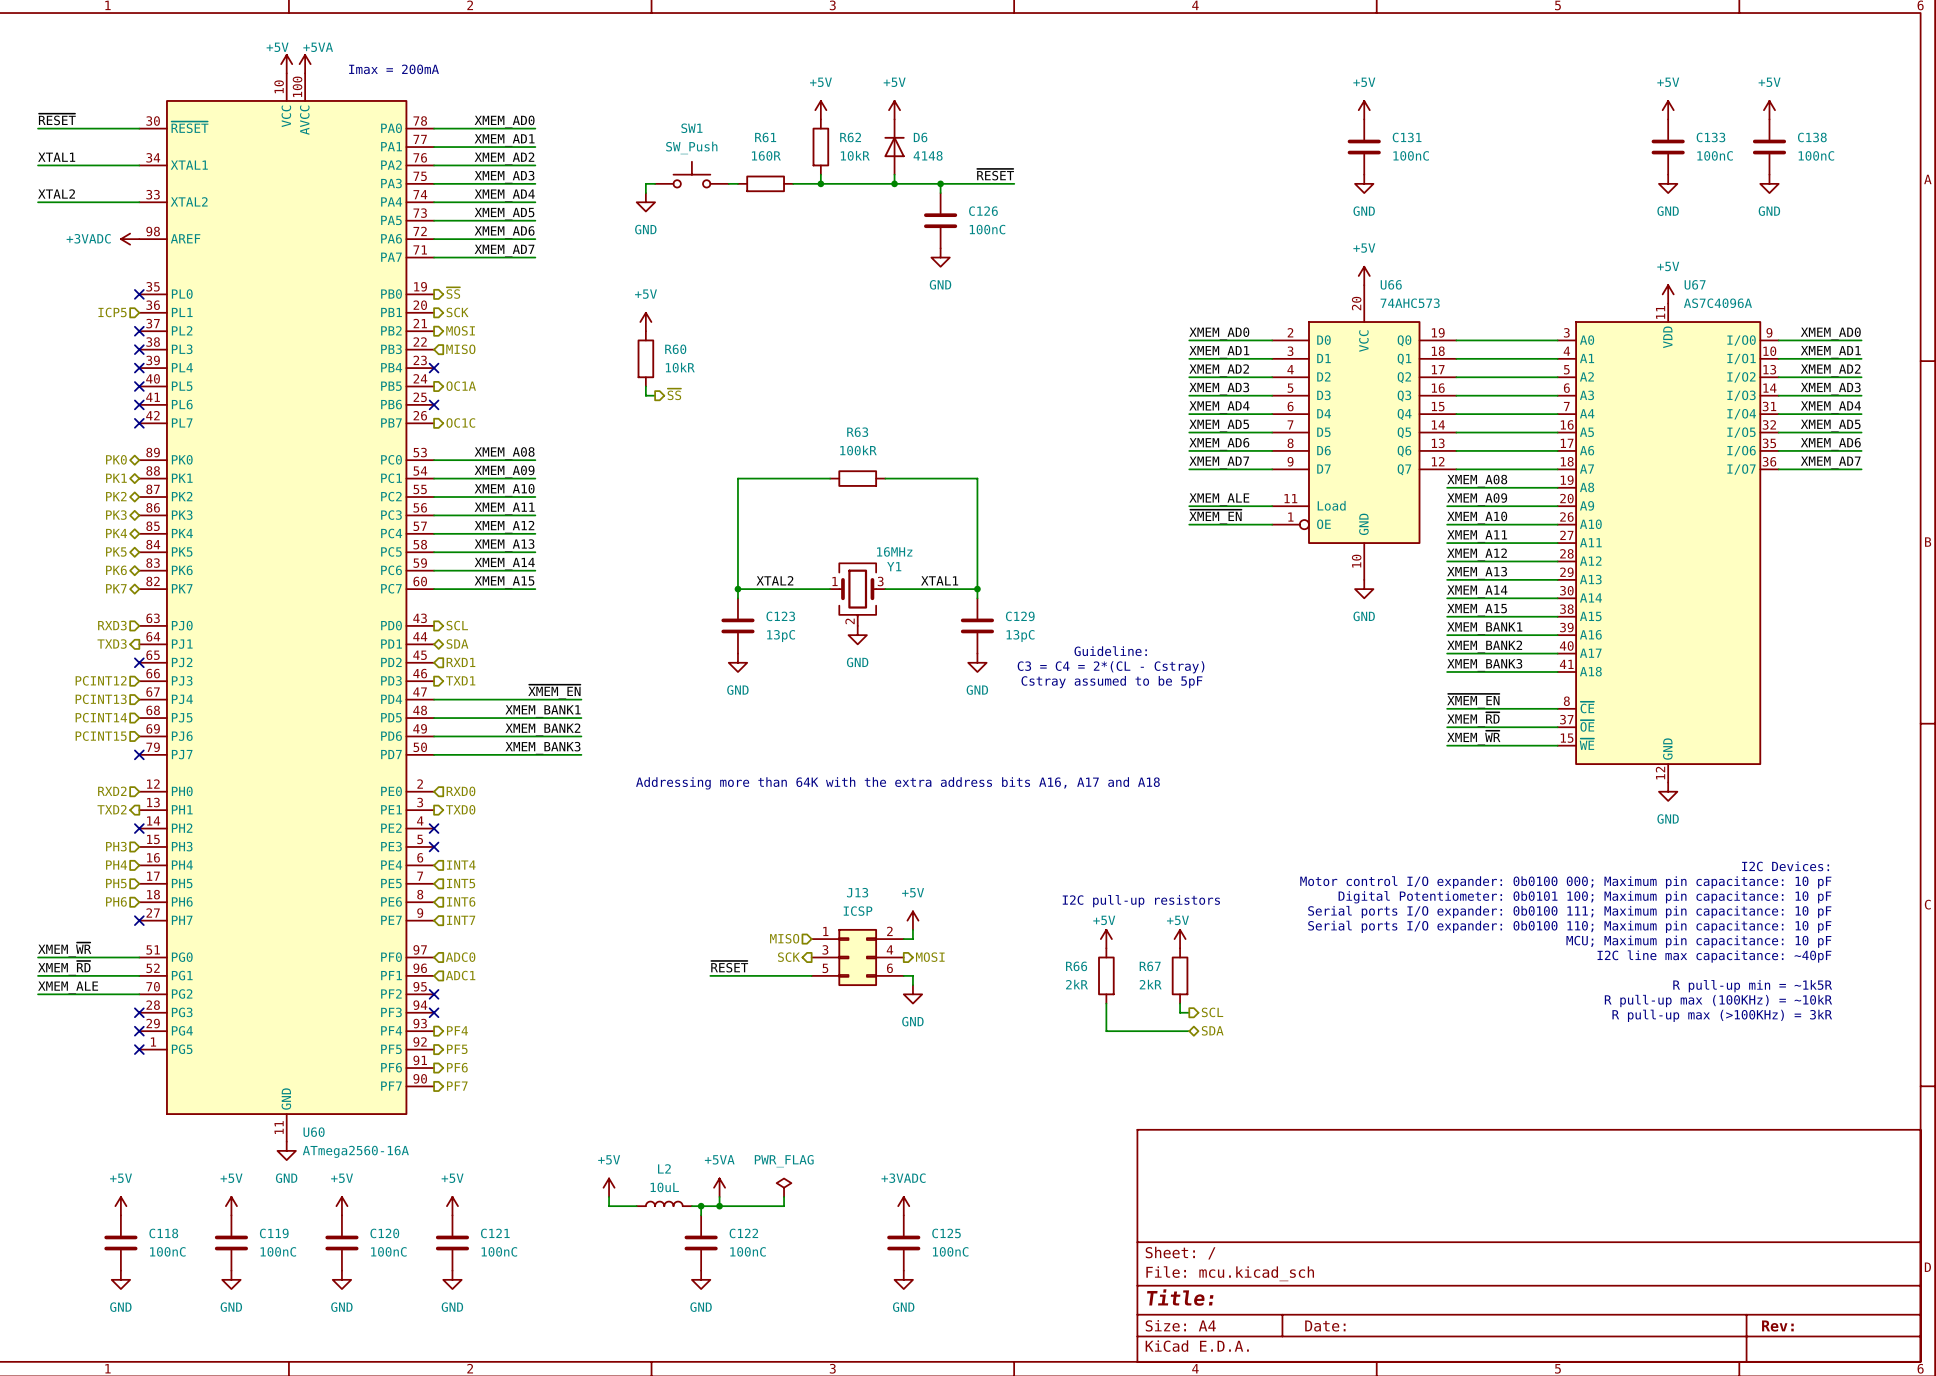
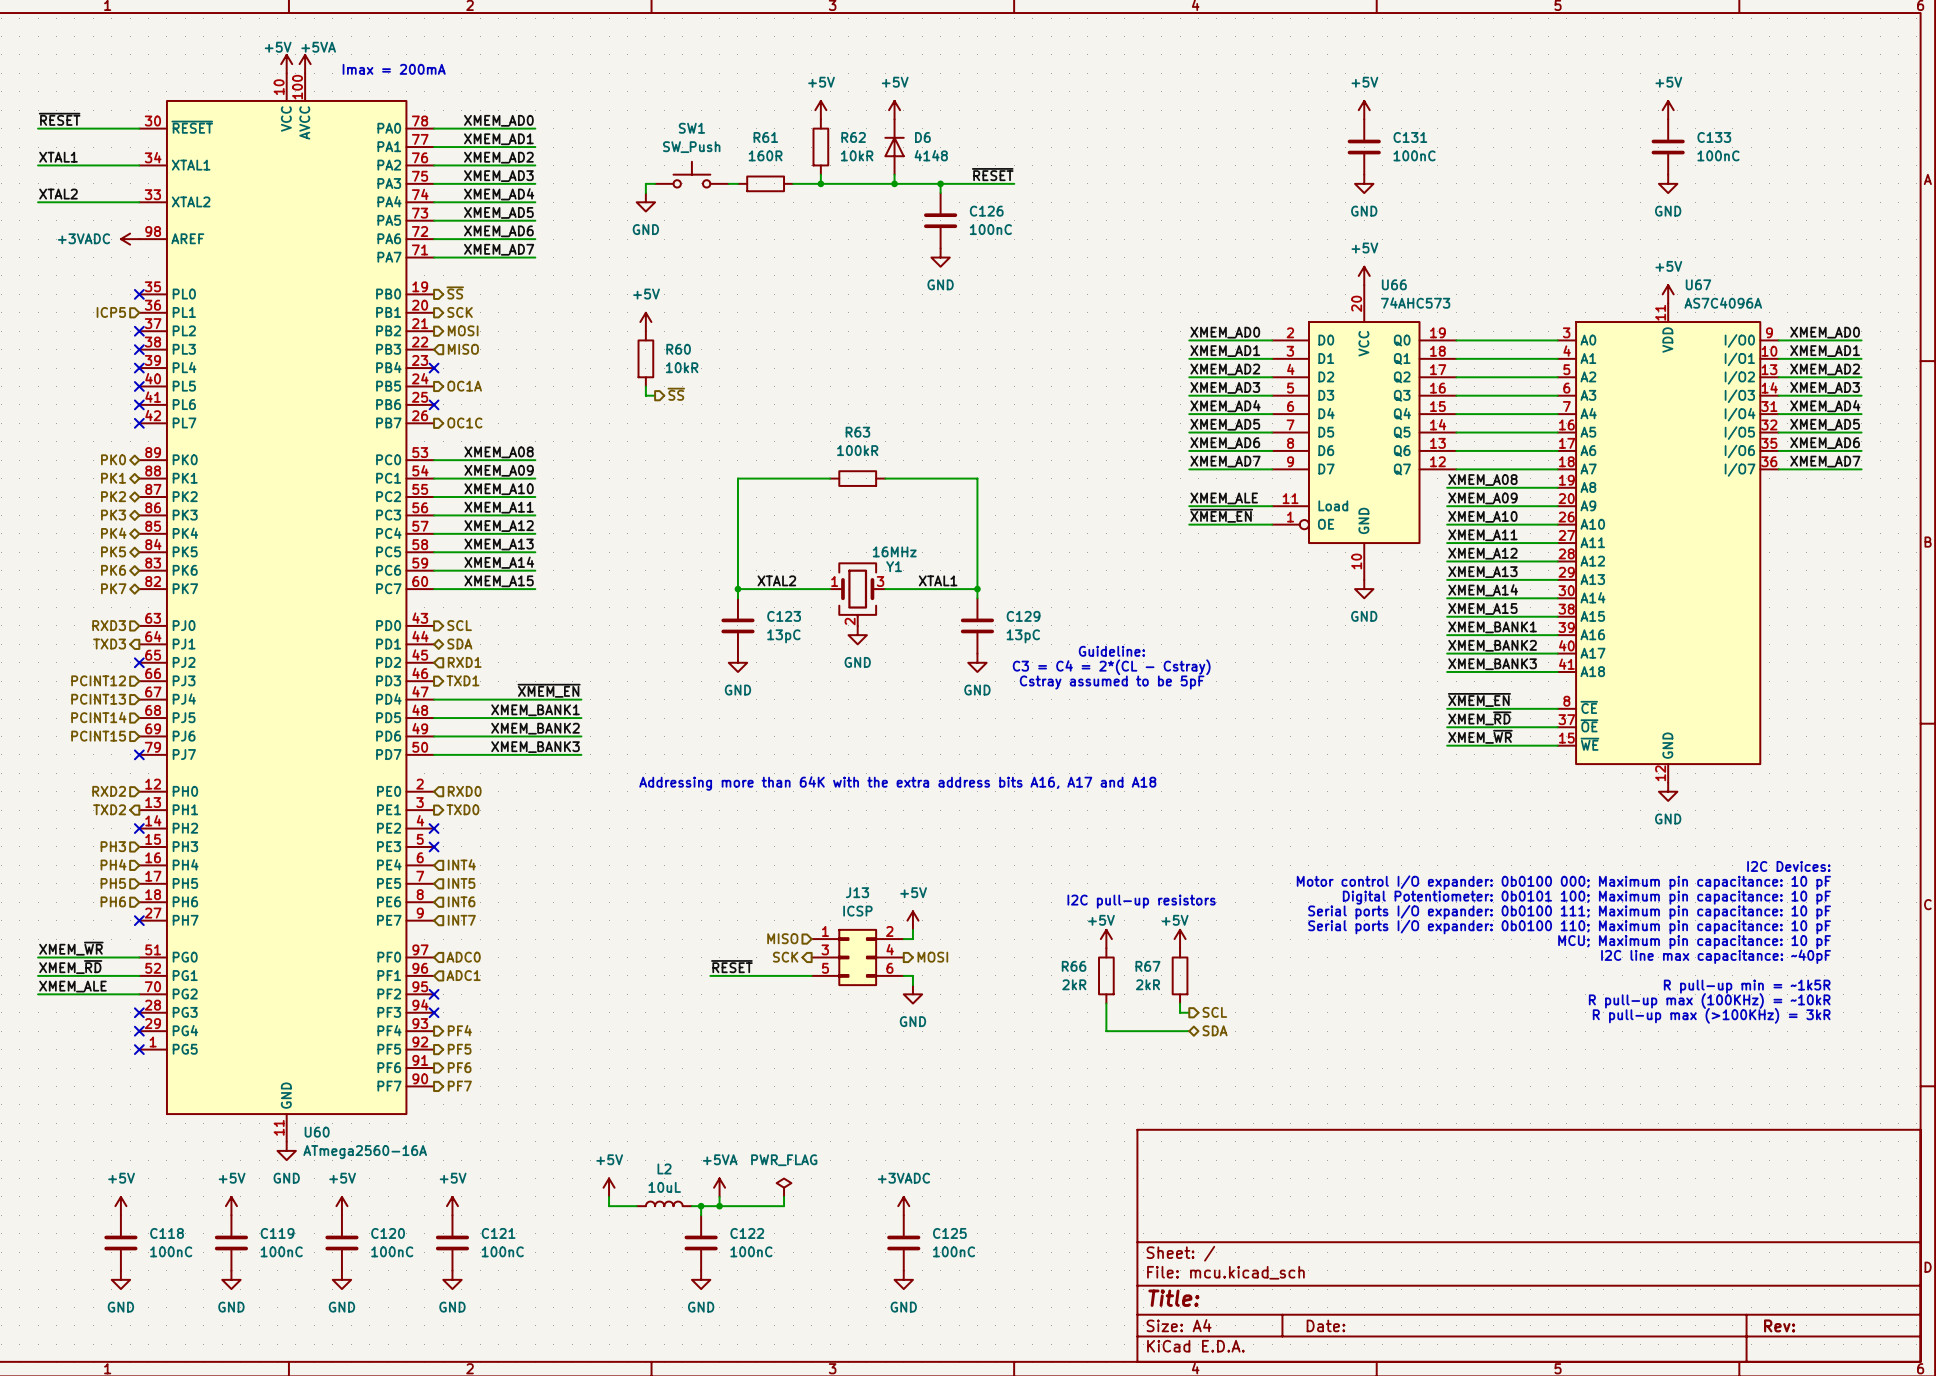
power symbol: +5V (1769, 110) -> none
C138: 100nC (1769, 147) -> none
power symbol: GND (1769, 183) -> none

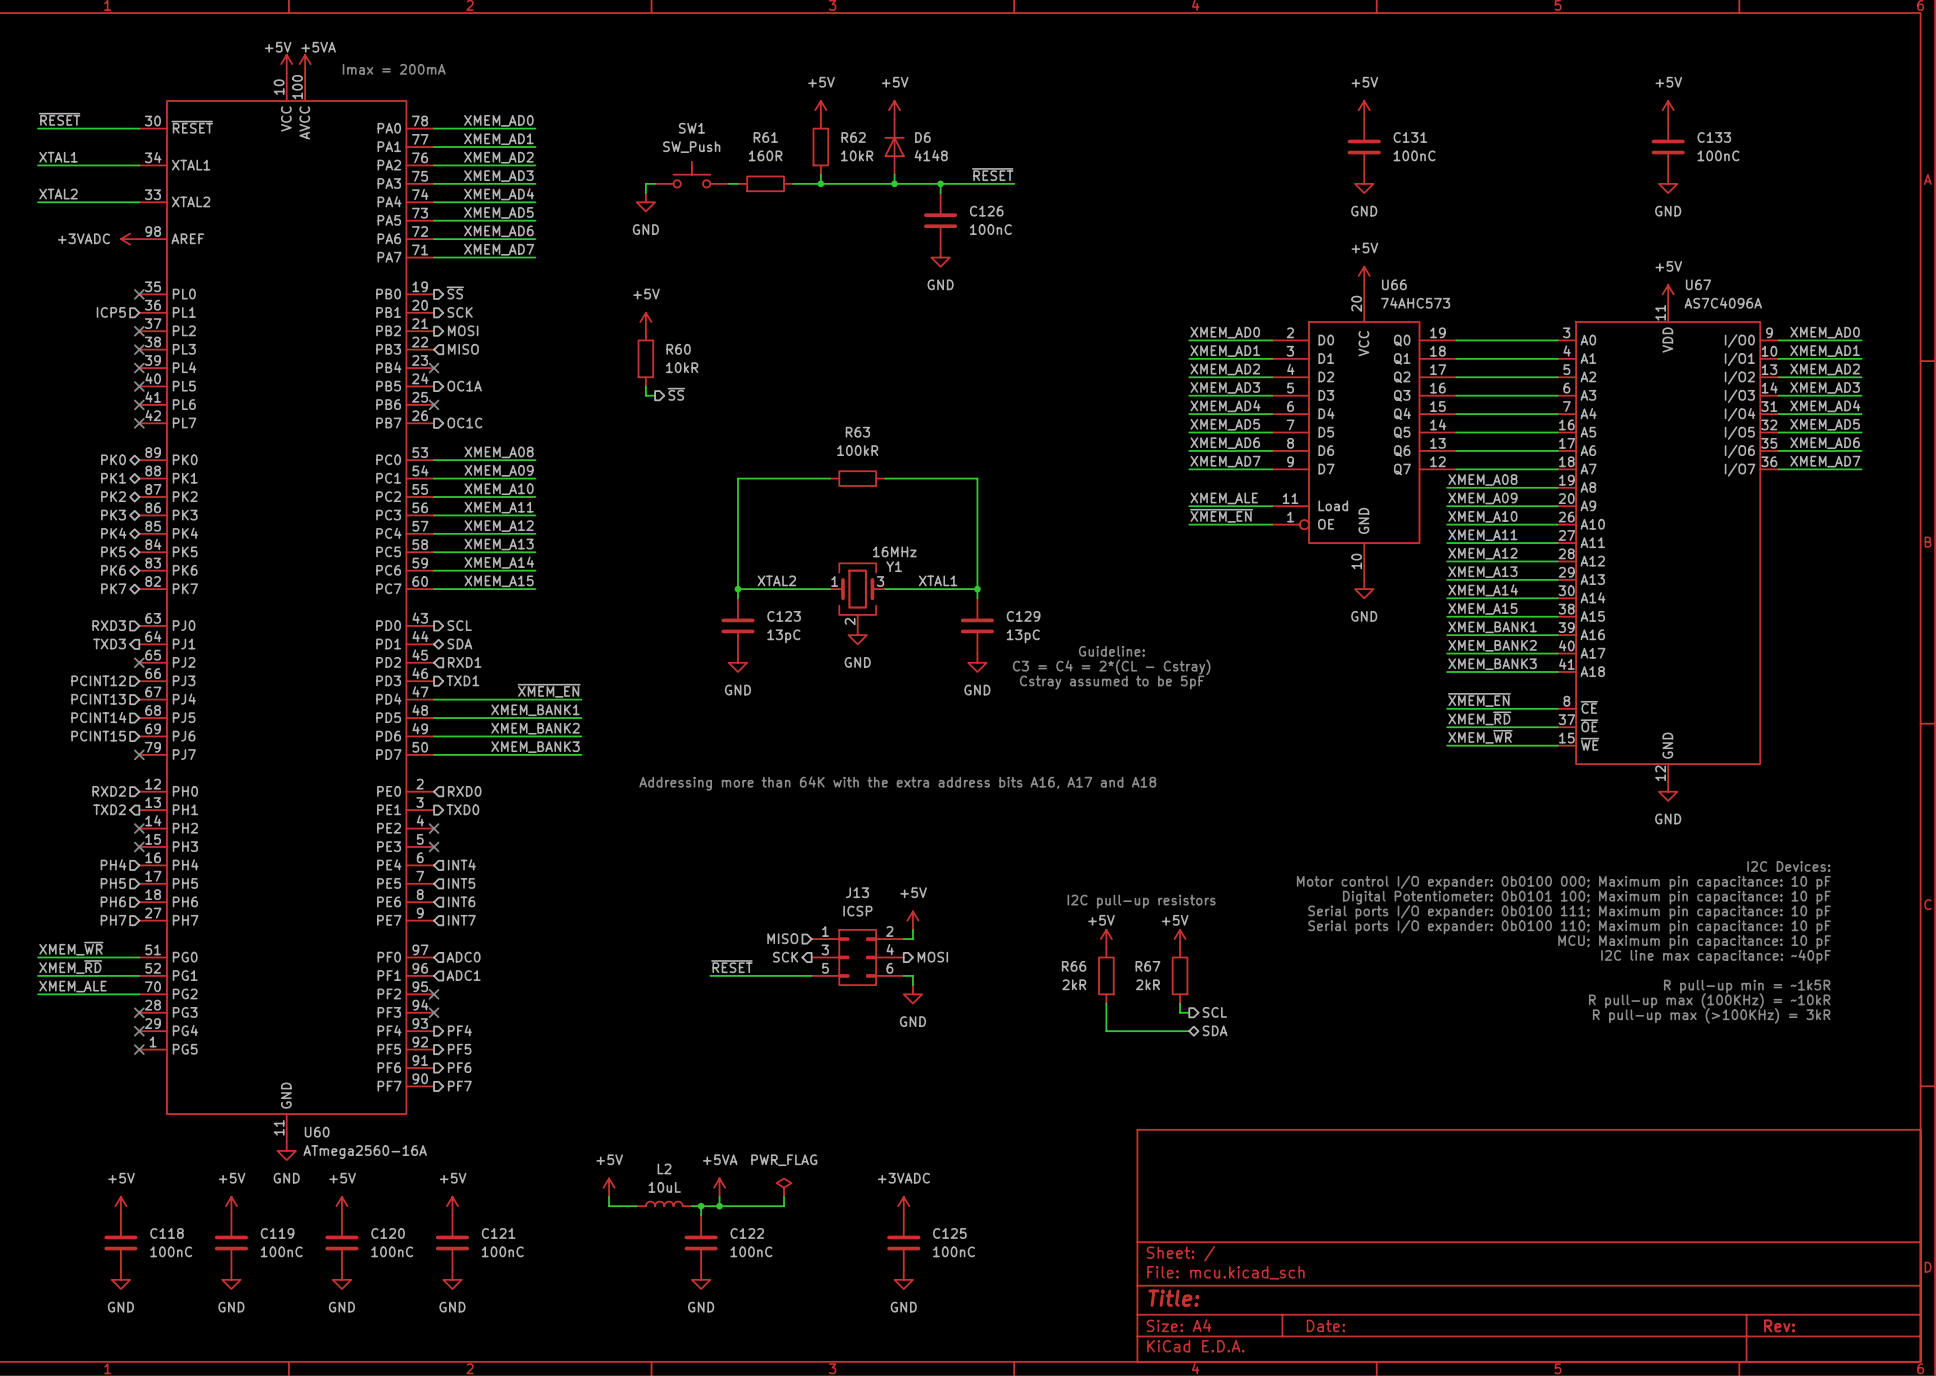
hierarchical label: PH3 (113, 846) -> none
no-connect mark: none -> (139, 846)
hierarchical label: none -> PH7 (113, 920)
no-connect mark: (139, 920) -> none

